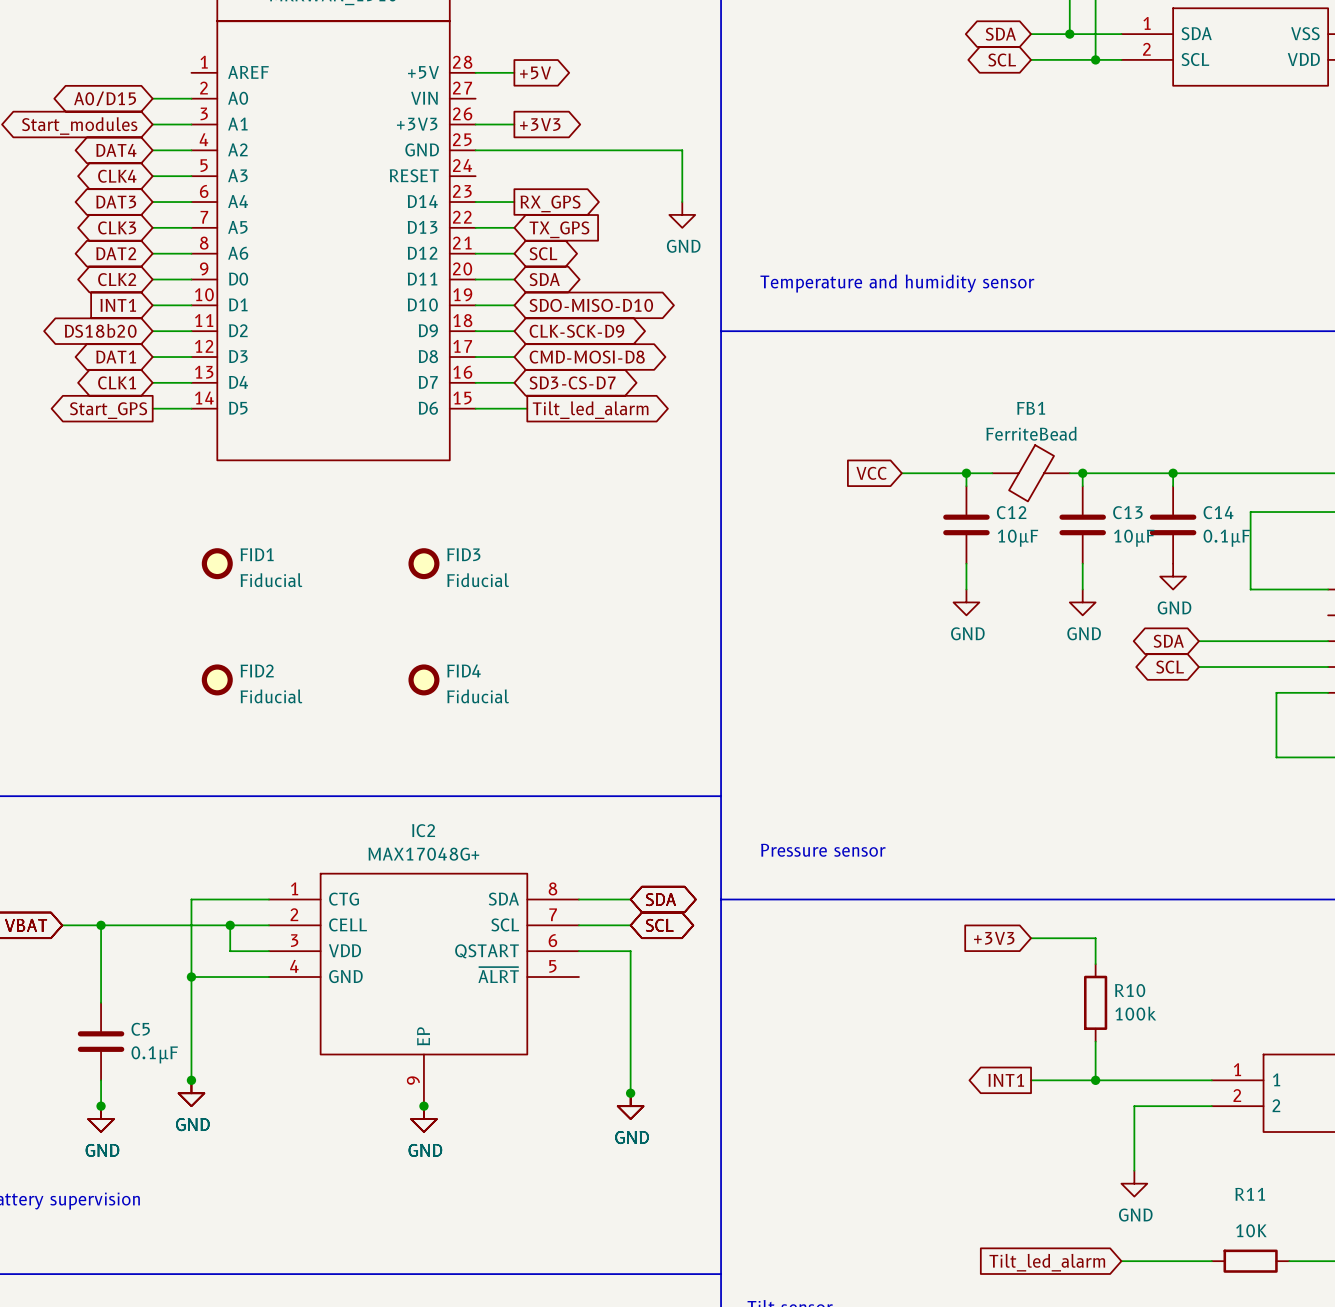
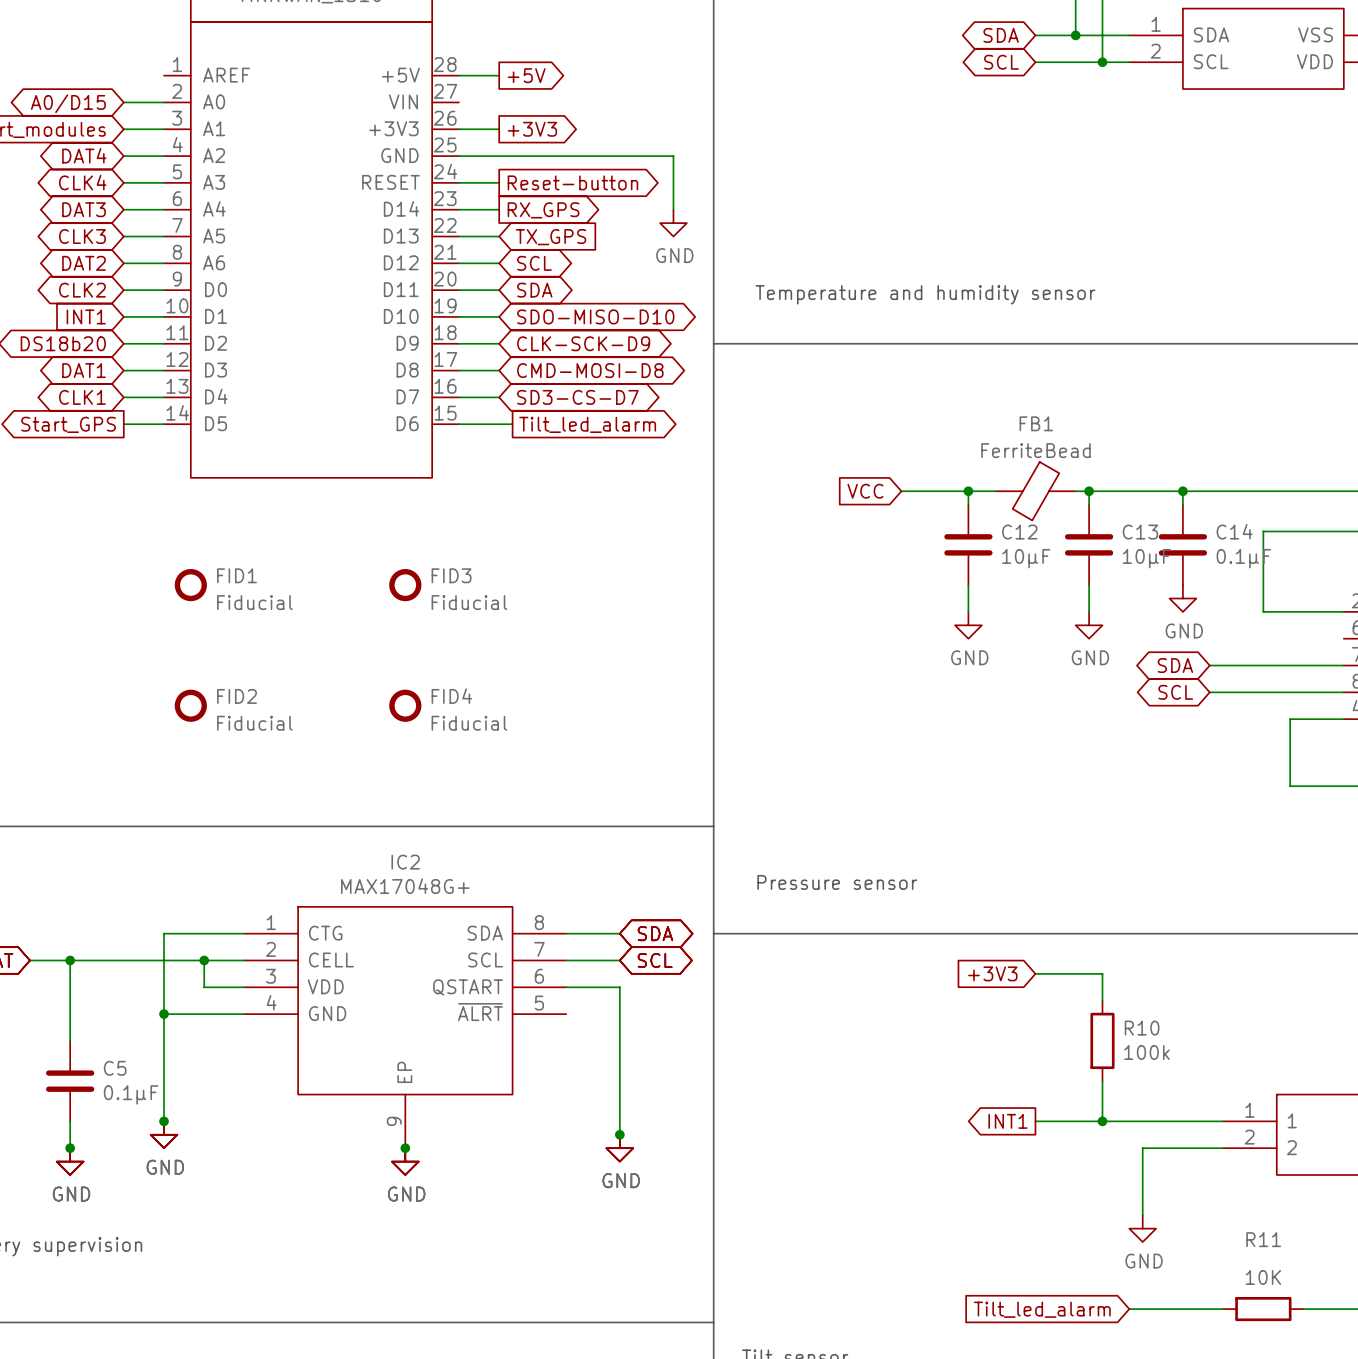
global label: none -> Reset-button (572, 182)
wire: none -> (458, 182) (499, 182)

